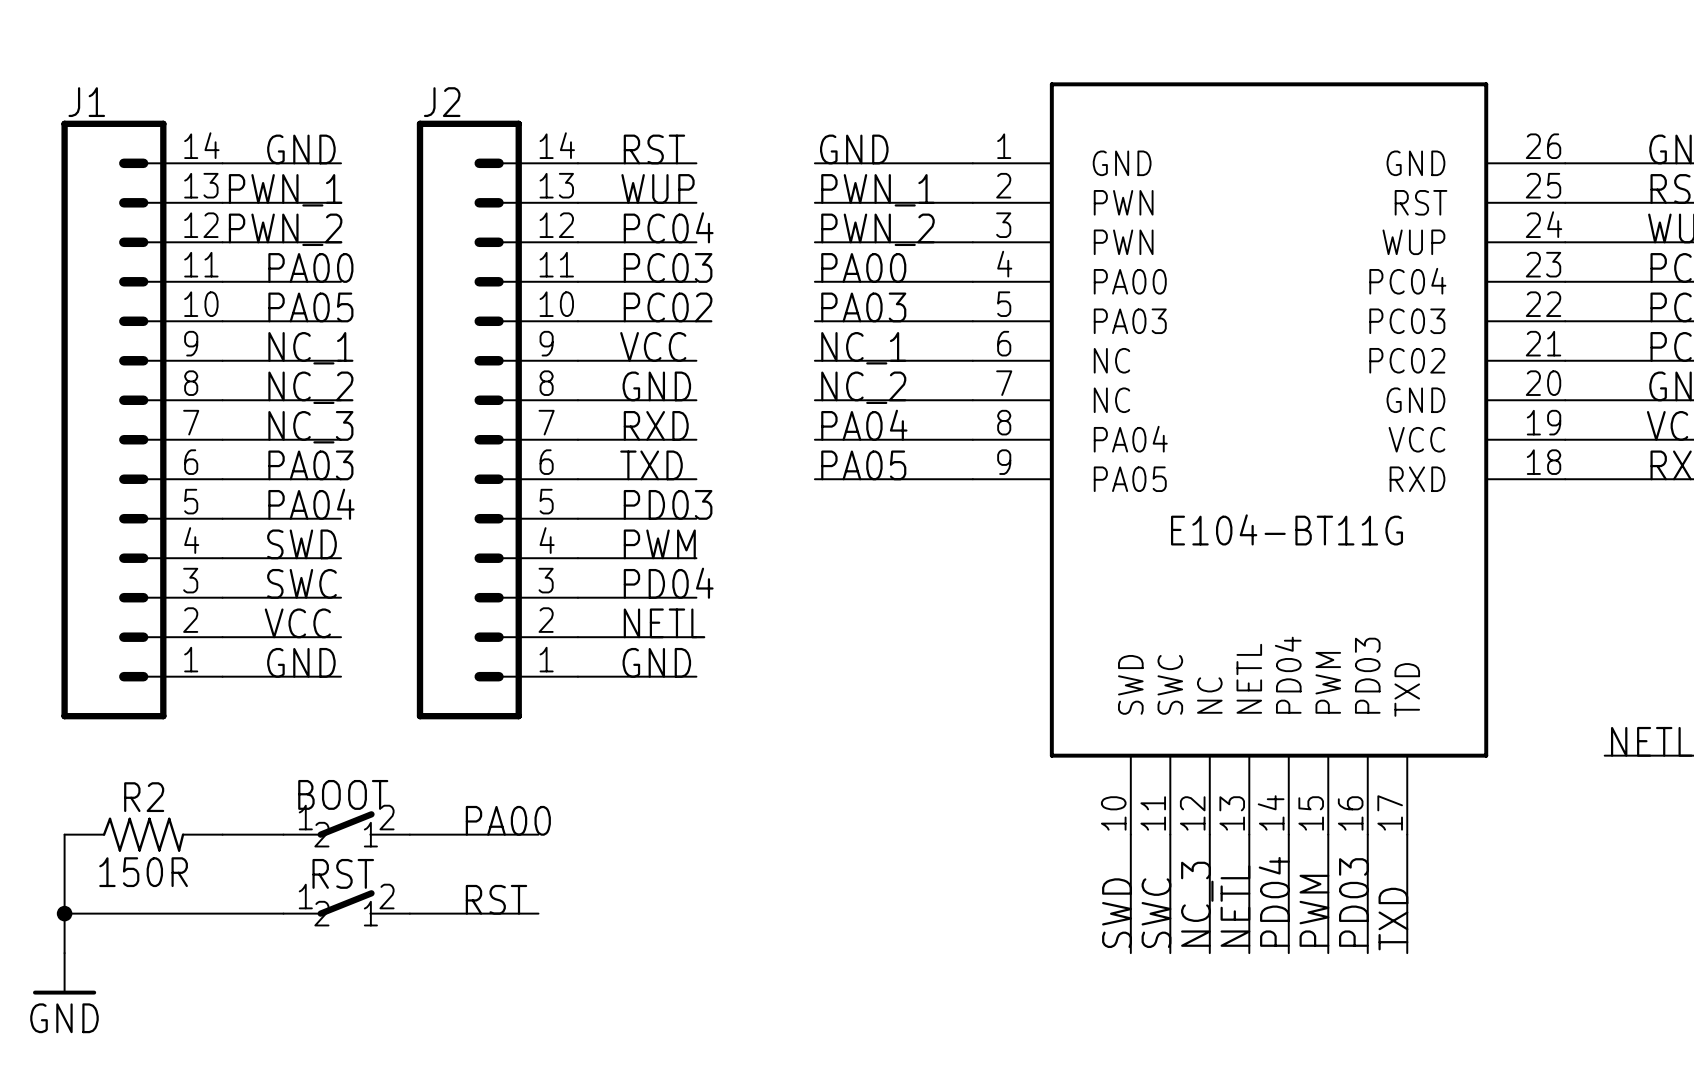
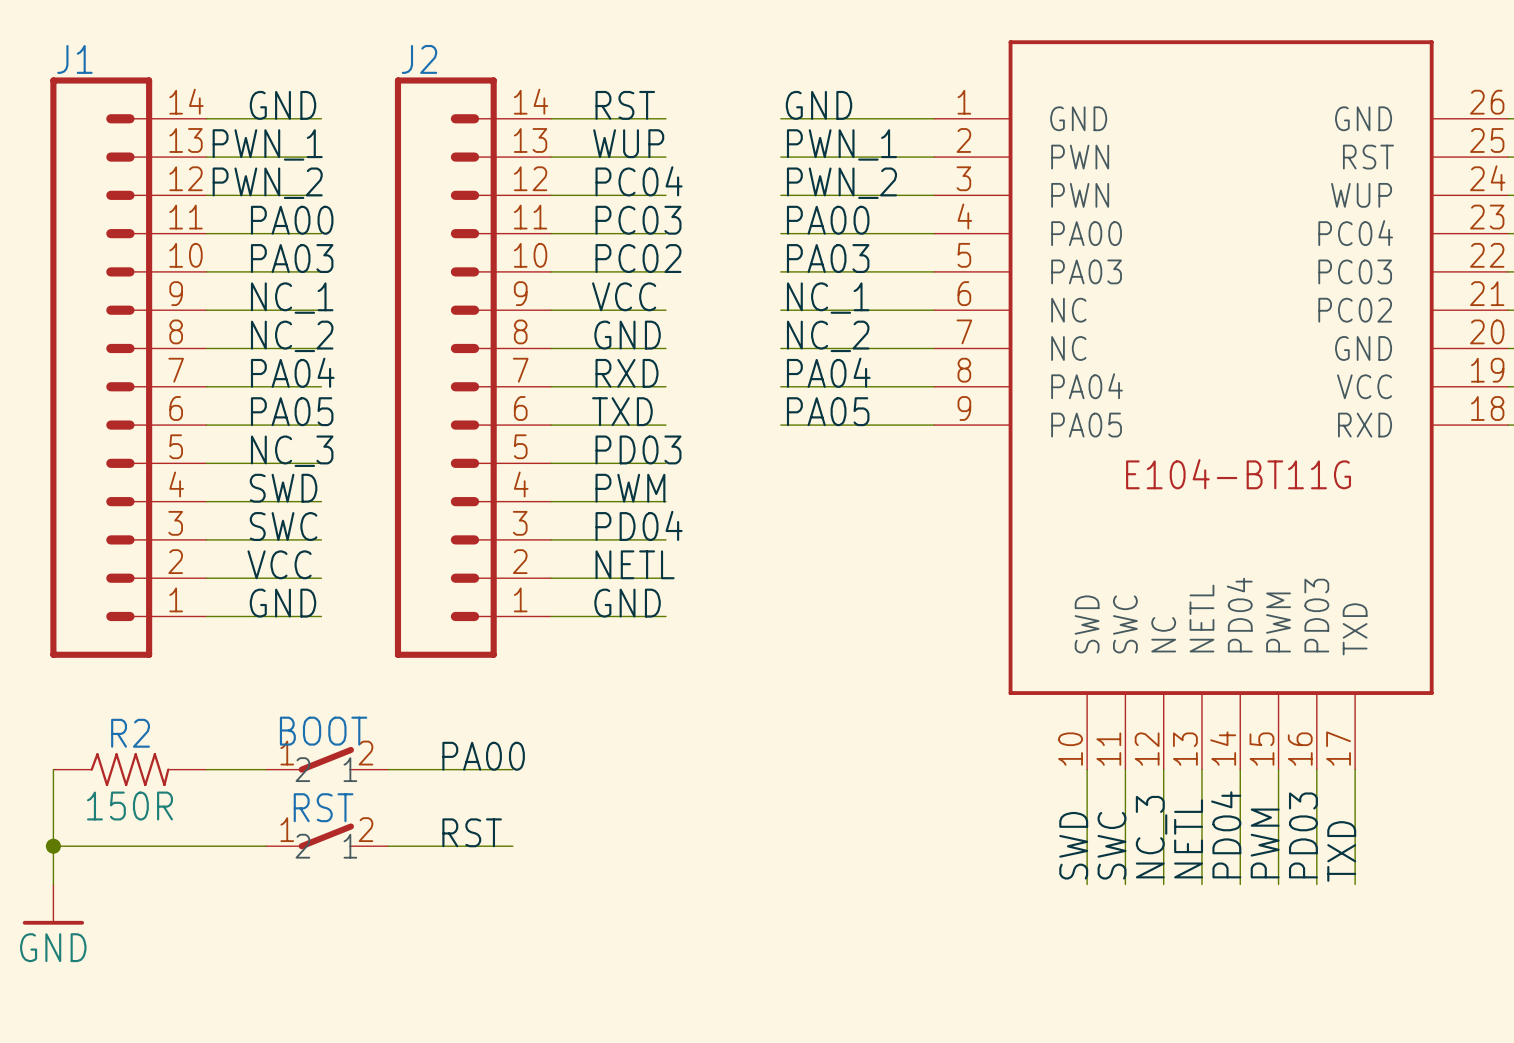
label: PA05 (310, 307) -> PA03 (292, 258)
label: NC_3 (310, 427) -> PA04 (292, 372)
label: PA03 (310, 465) -> PA05 (292, 411)
label: PA04 (311, 504) -> NC_3 (292, 451)

